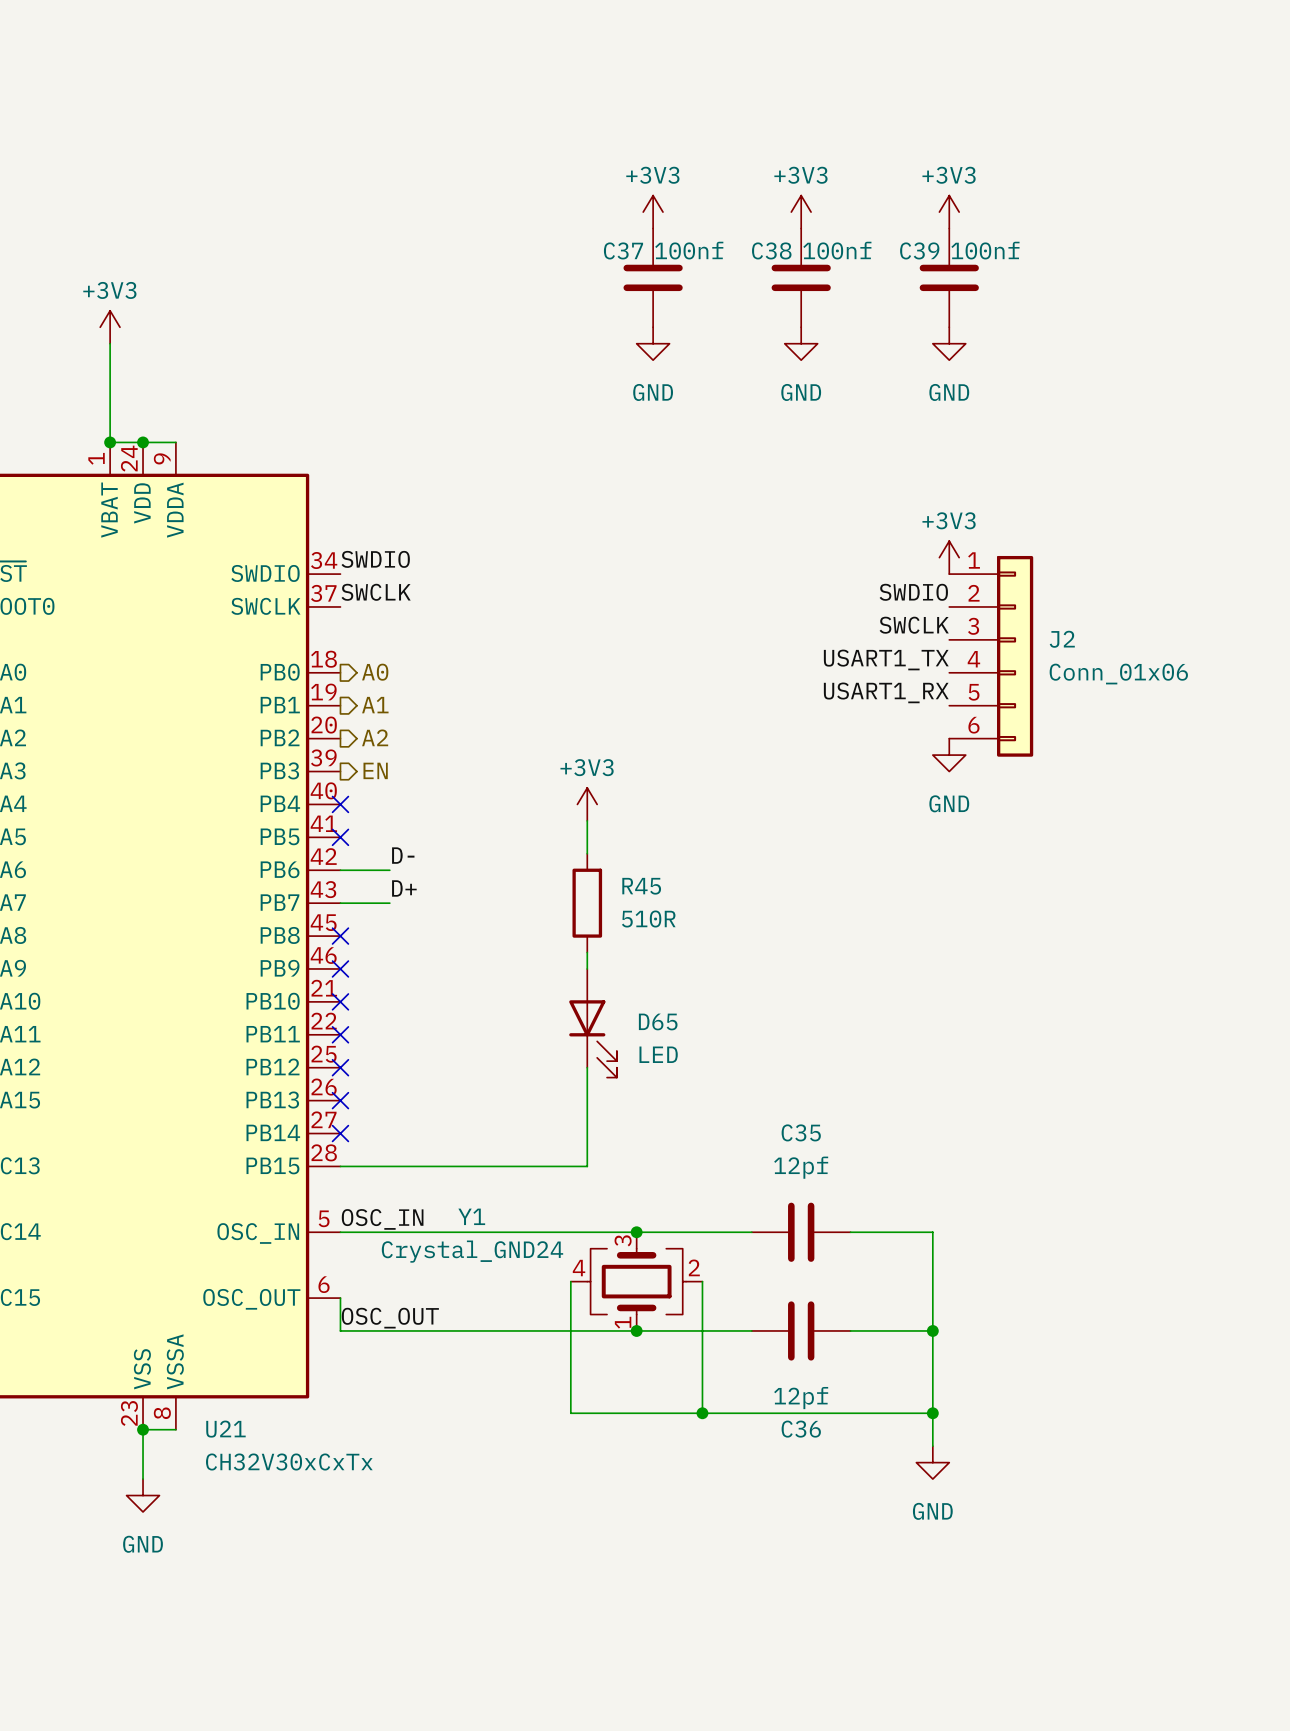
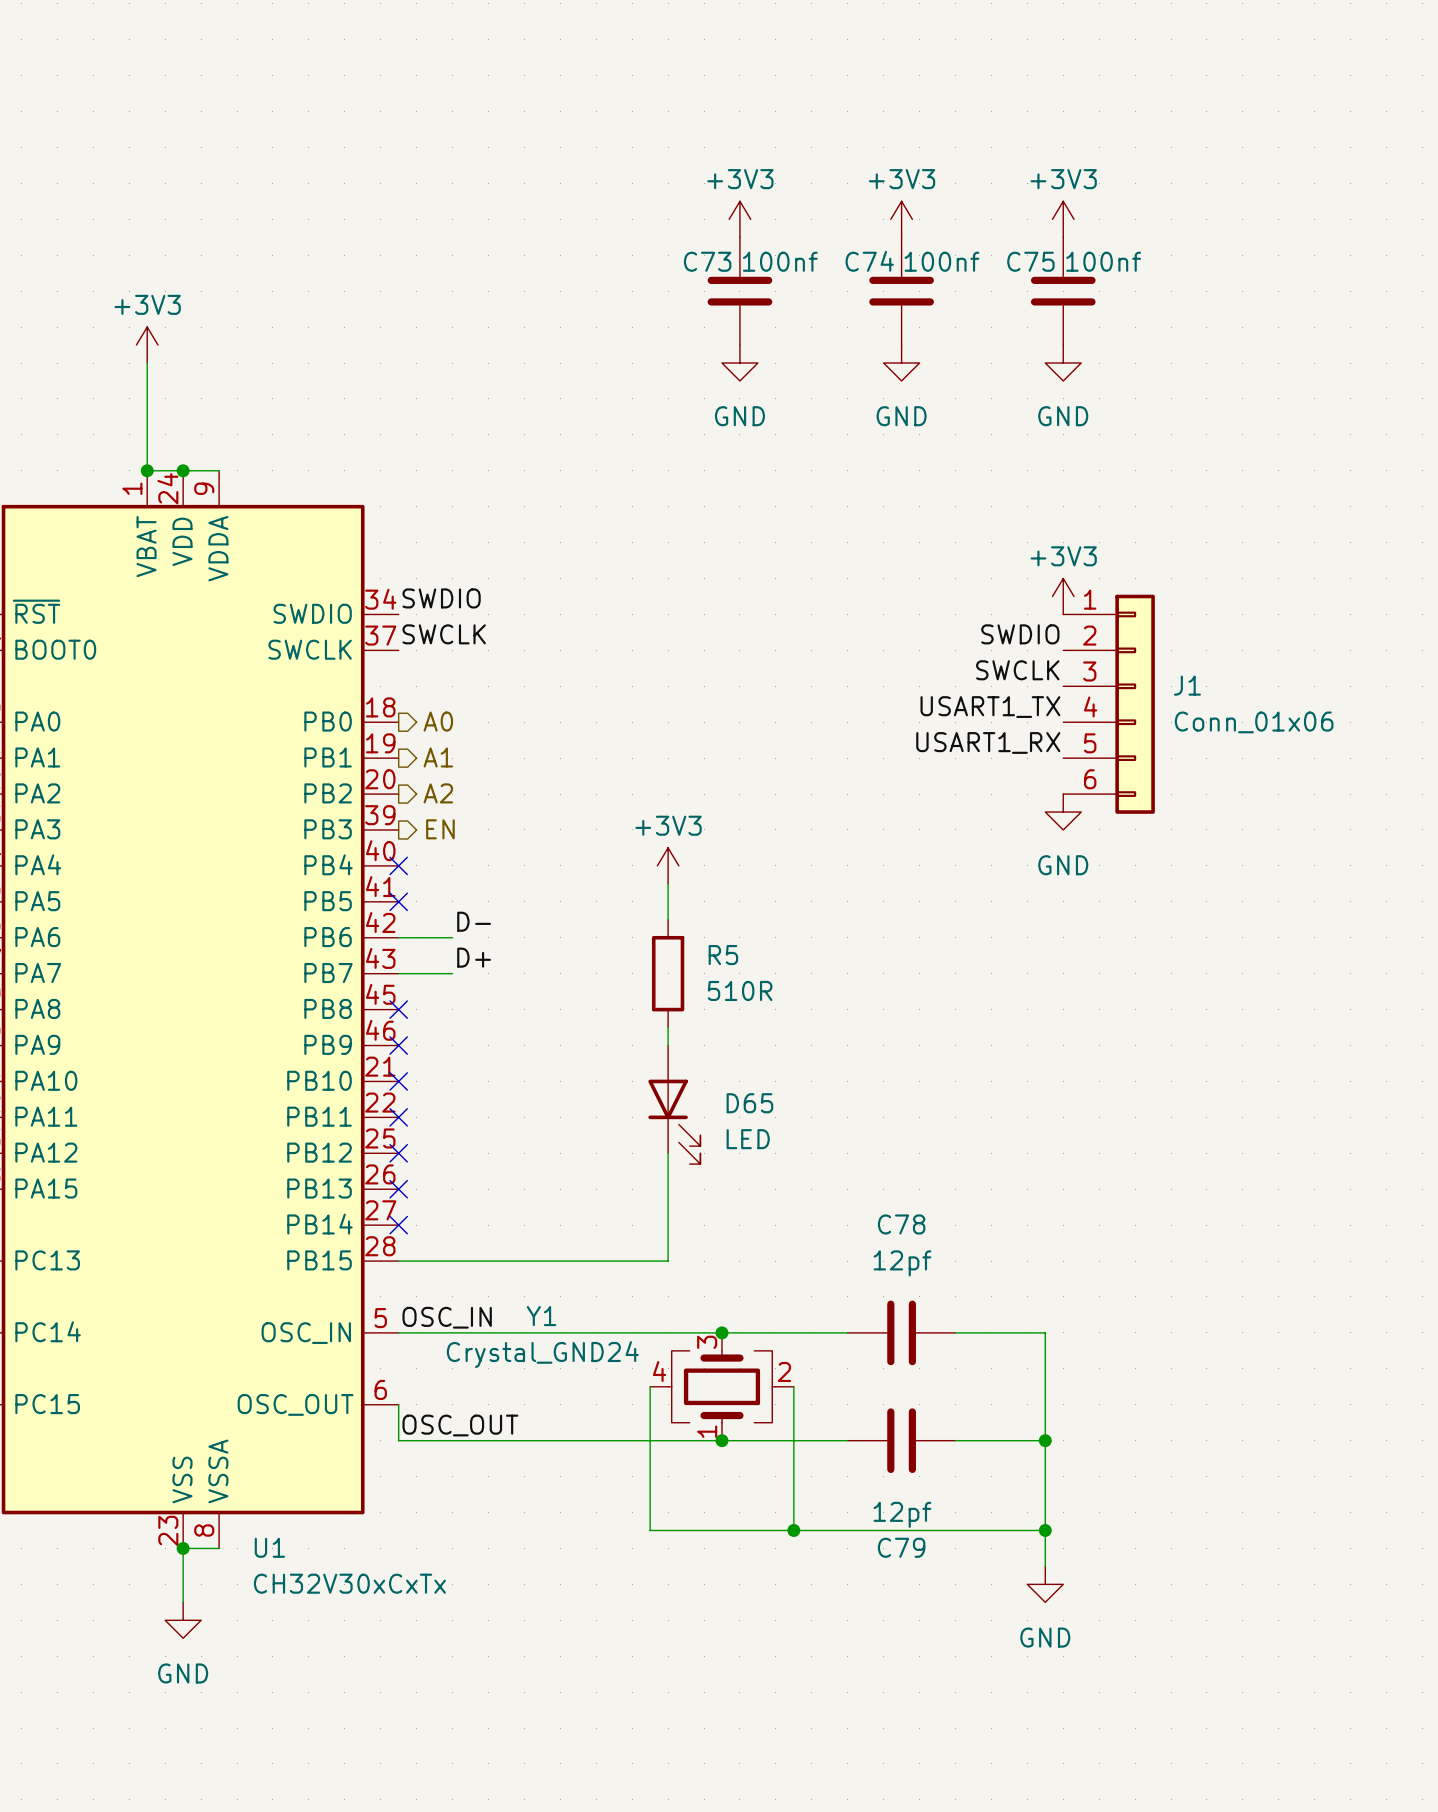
C37 name: C37 (623, 250) -> C73 (707, 261)
C38 name: C38 (771, 250) -> C74 (869, 261)
C39 name: C39 (919, 250) -> C75 (1030, 261)
J2 name: J2 (1062, 639) -> J1 (1187, 685)
R45 name: R45 (641, 886) -> R5 (723, 955)
C35 name: C35 (801, 1132) -> C78 (901, 1224)
U21 name: U21 (225, 1429) -> U1 (269, 1547)
C36 name: C36 (801, 1429) -> C79 (901, 1547)

